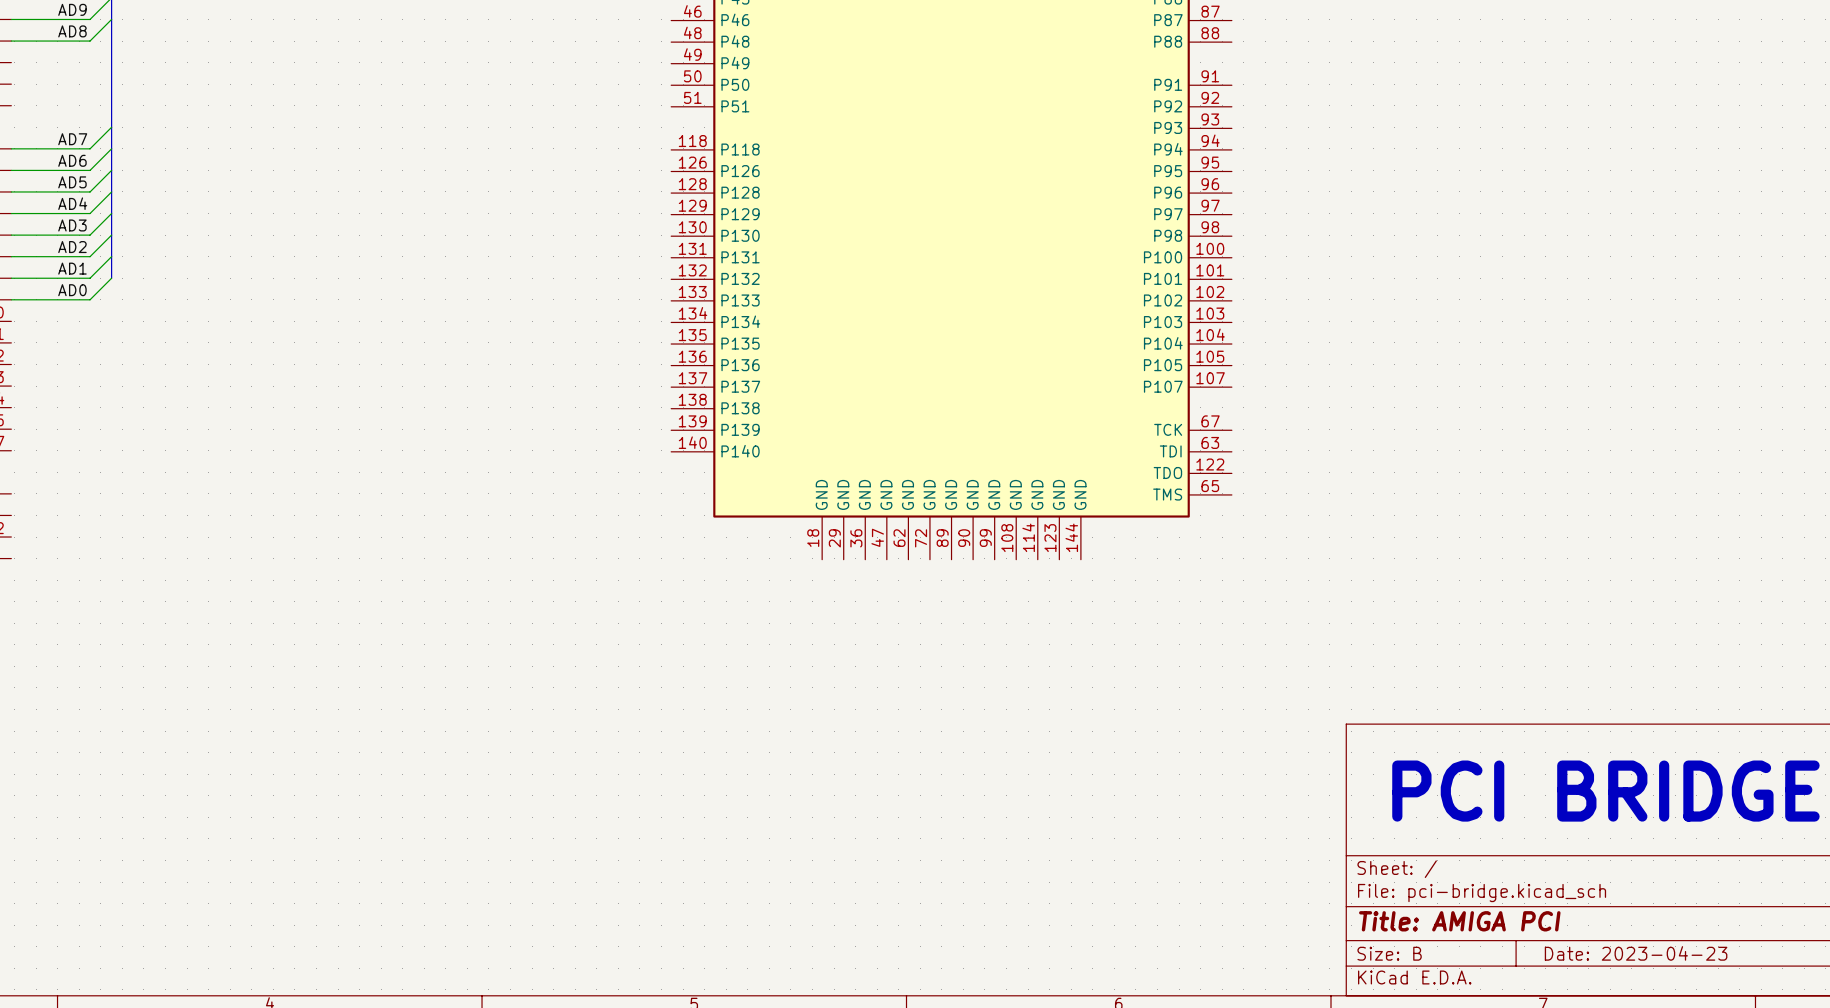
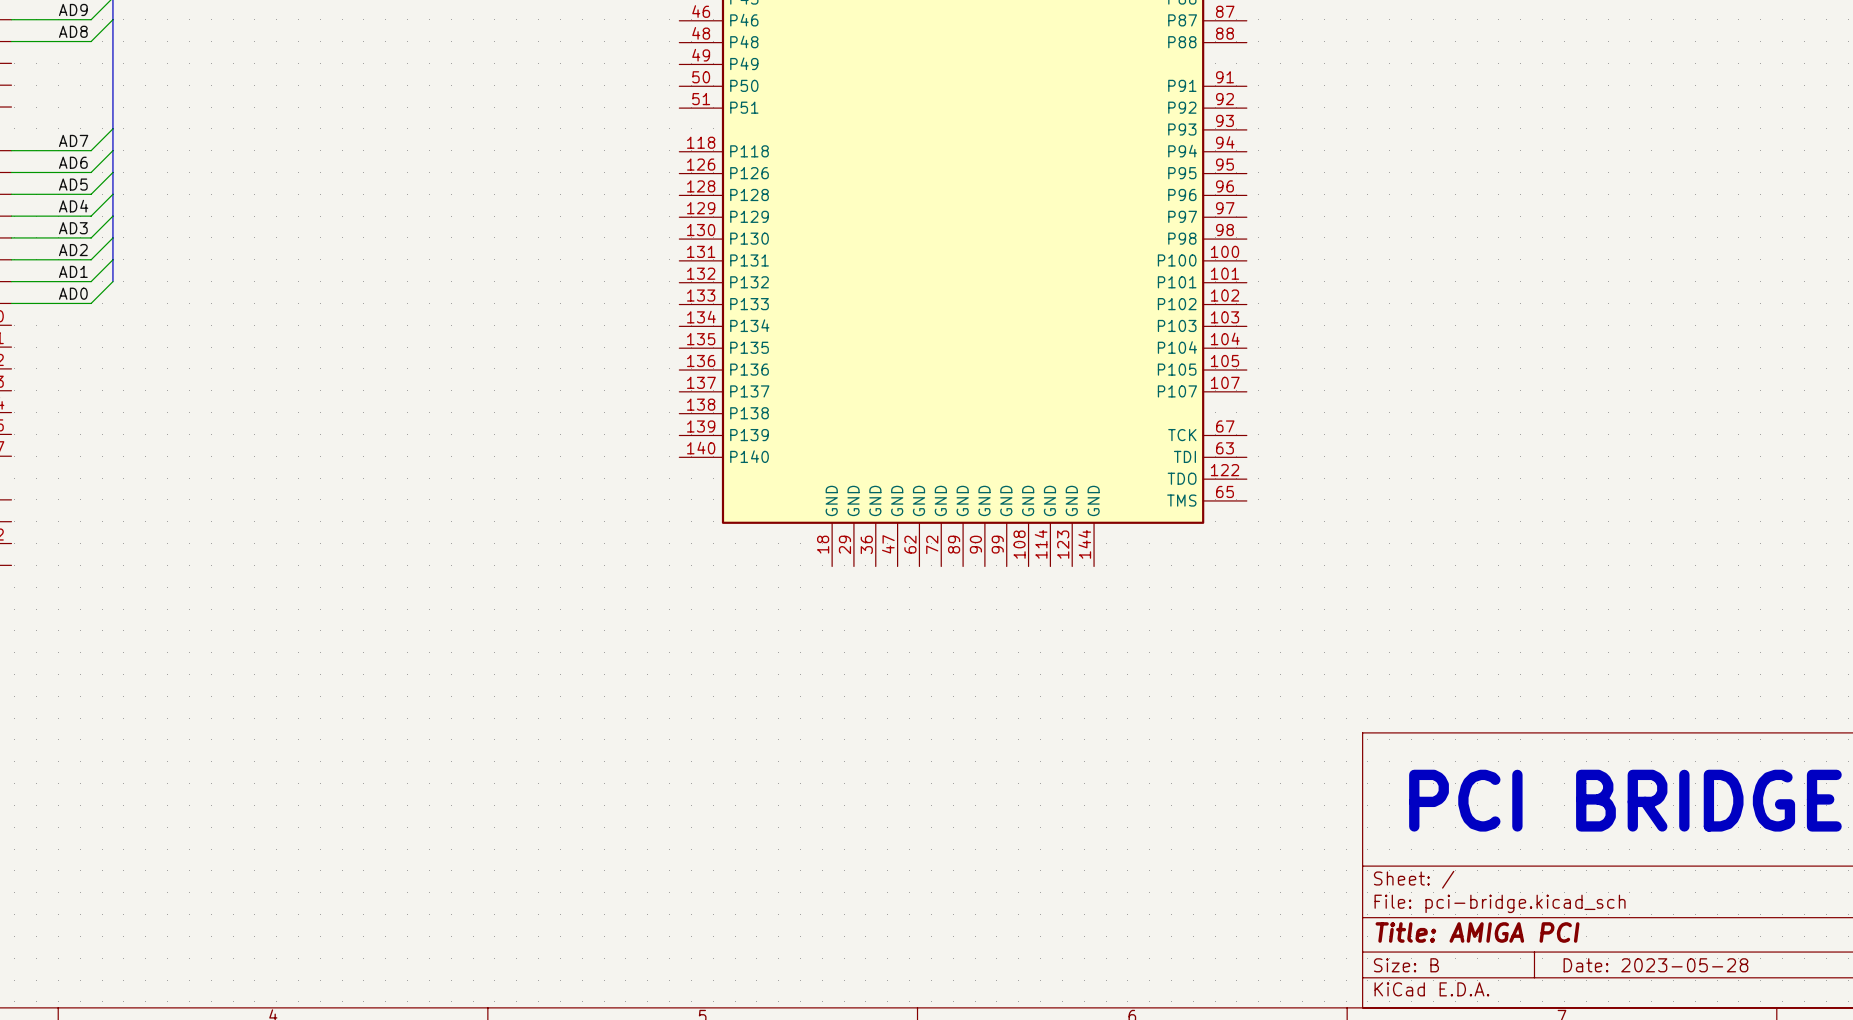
title block: Date: 2023-04-23 (1636, 953) -> Date: 2023-05-28 (1655, 965)

